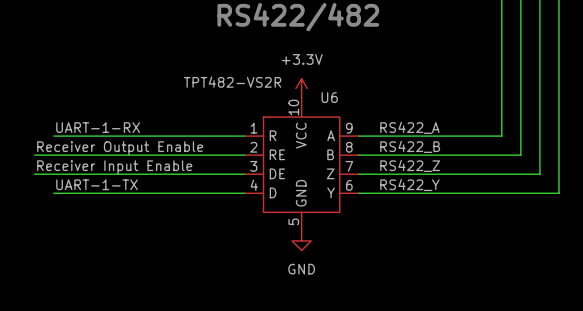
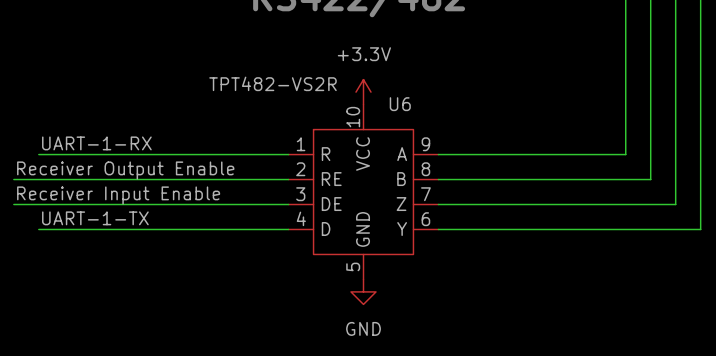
label: RS422_A (409, 127) -> none
label: RS422_B (410, 146) -> none
label: RS422_Z (410, 165) -> none
label: RS422_Y (409, 185) -> none

